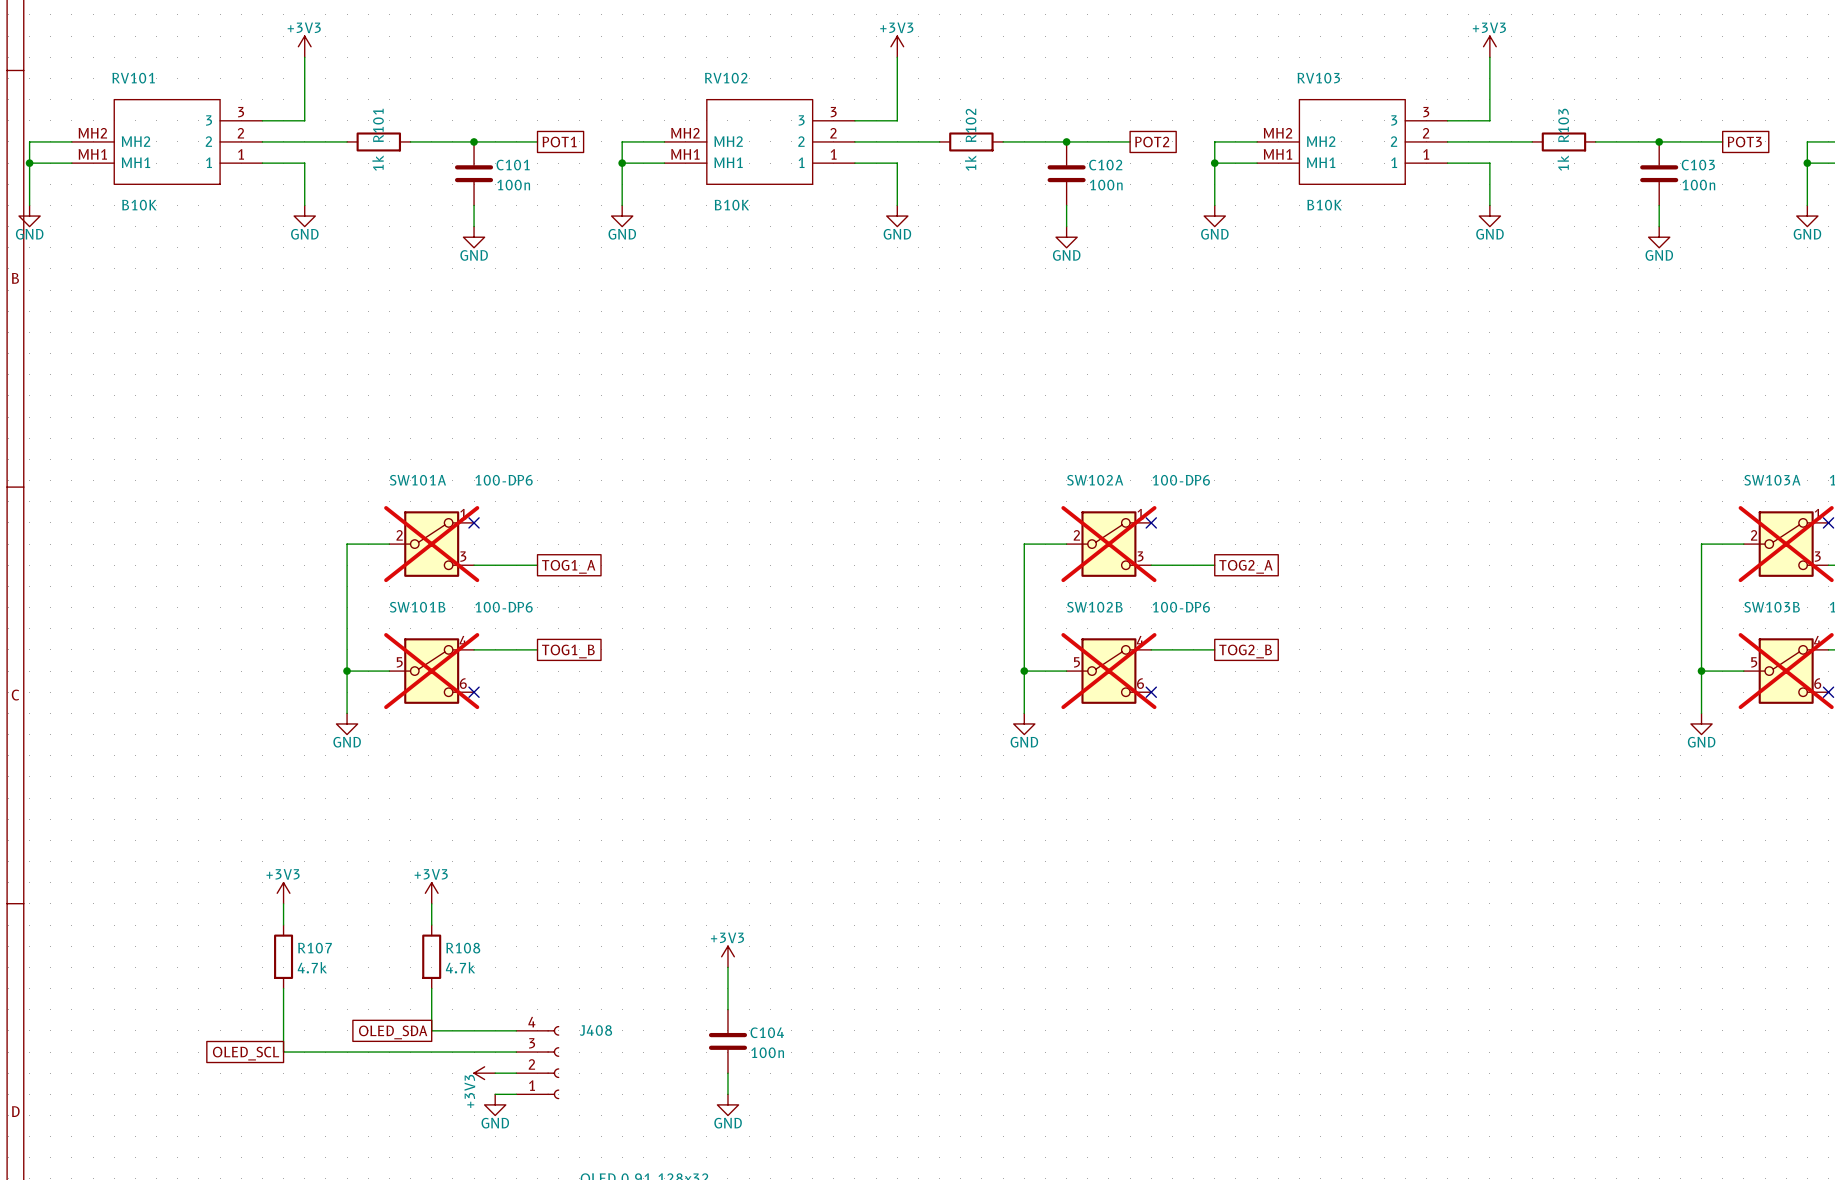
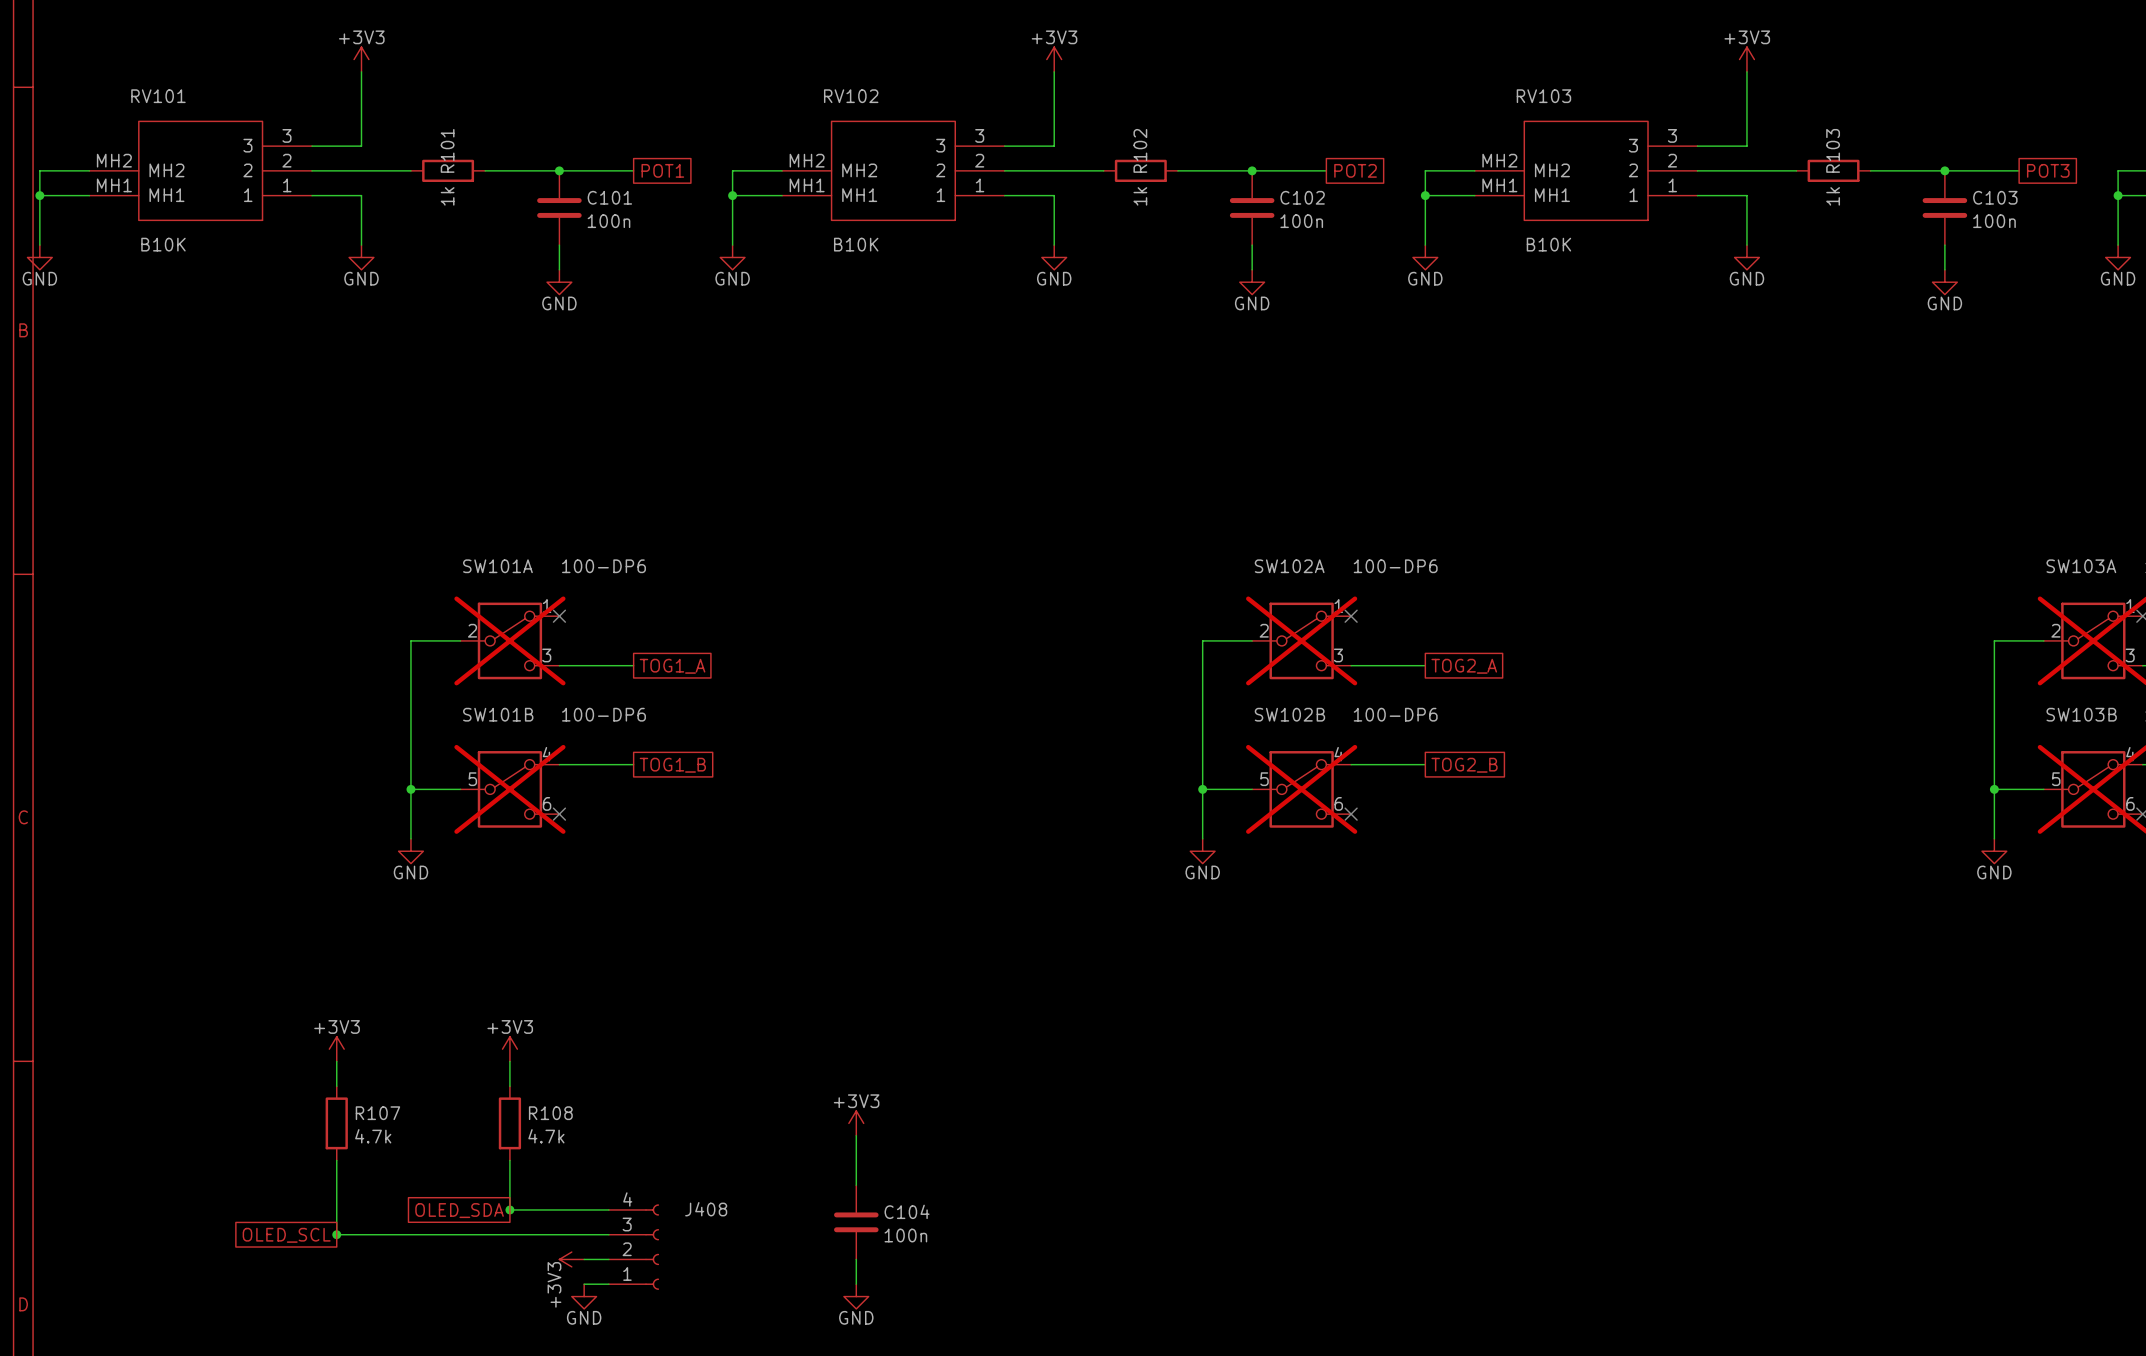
junction: none -> (509, 1209)
junction: none -> (336, 1234)

